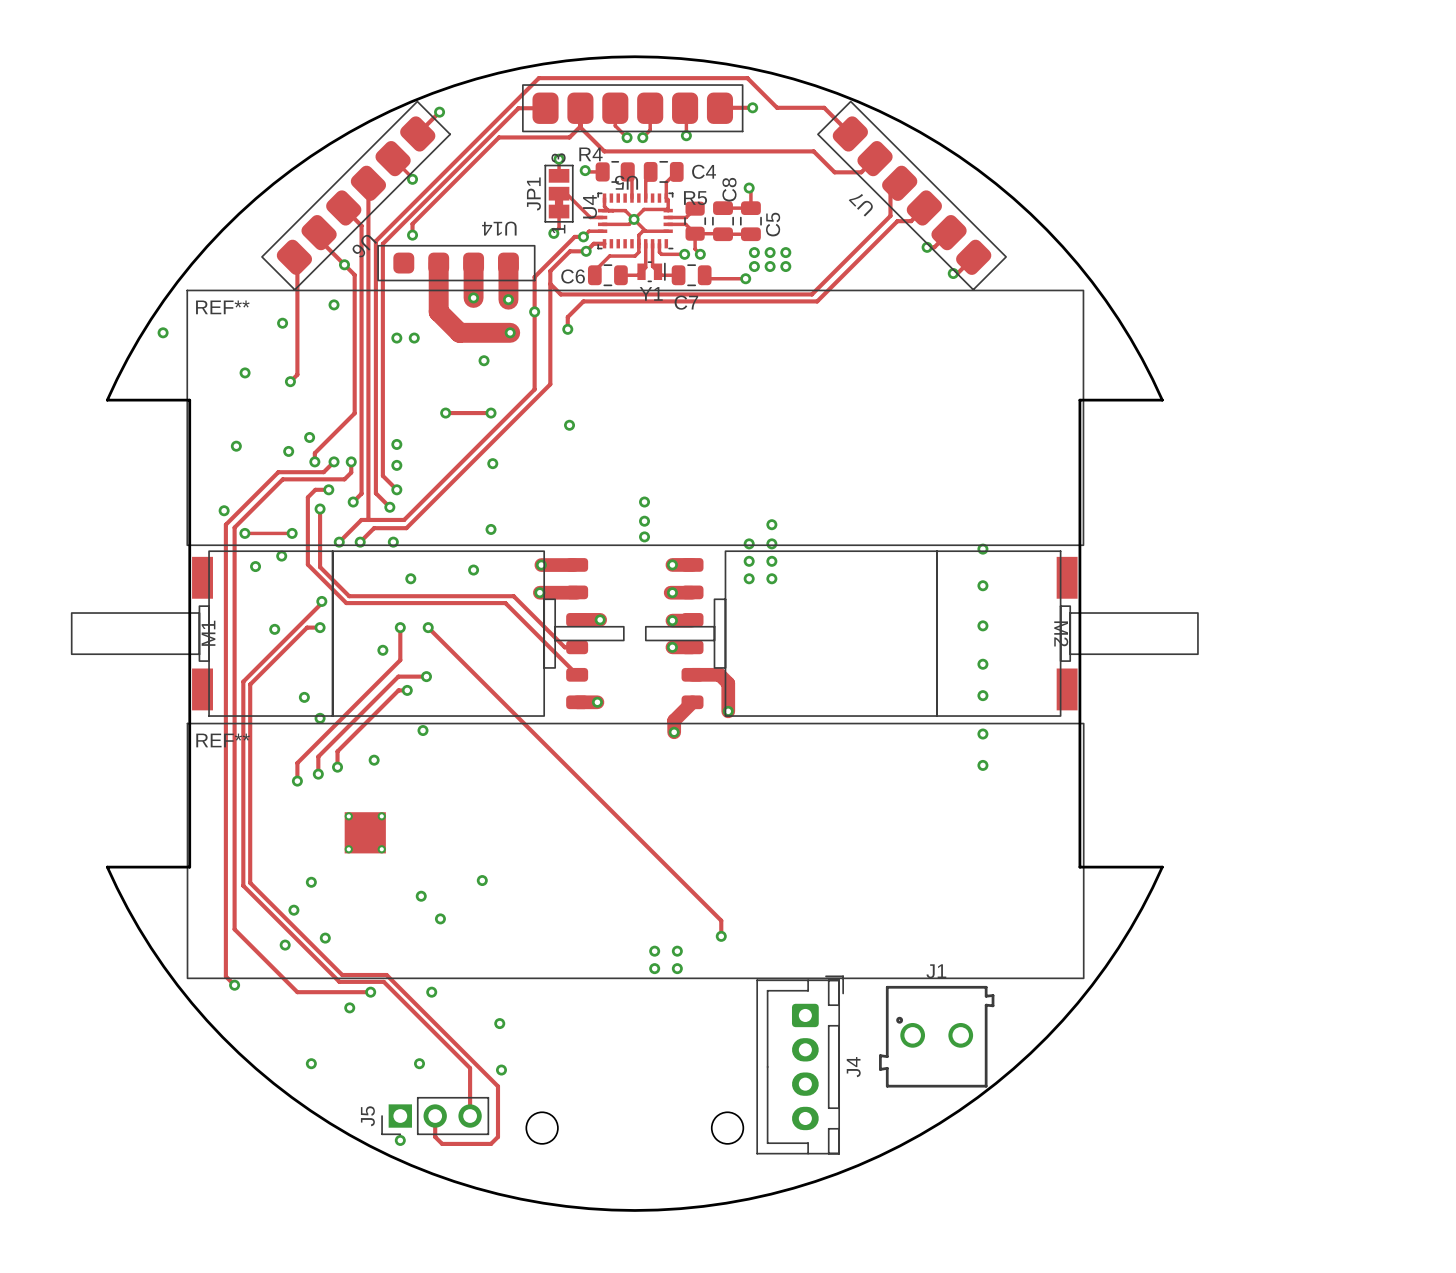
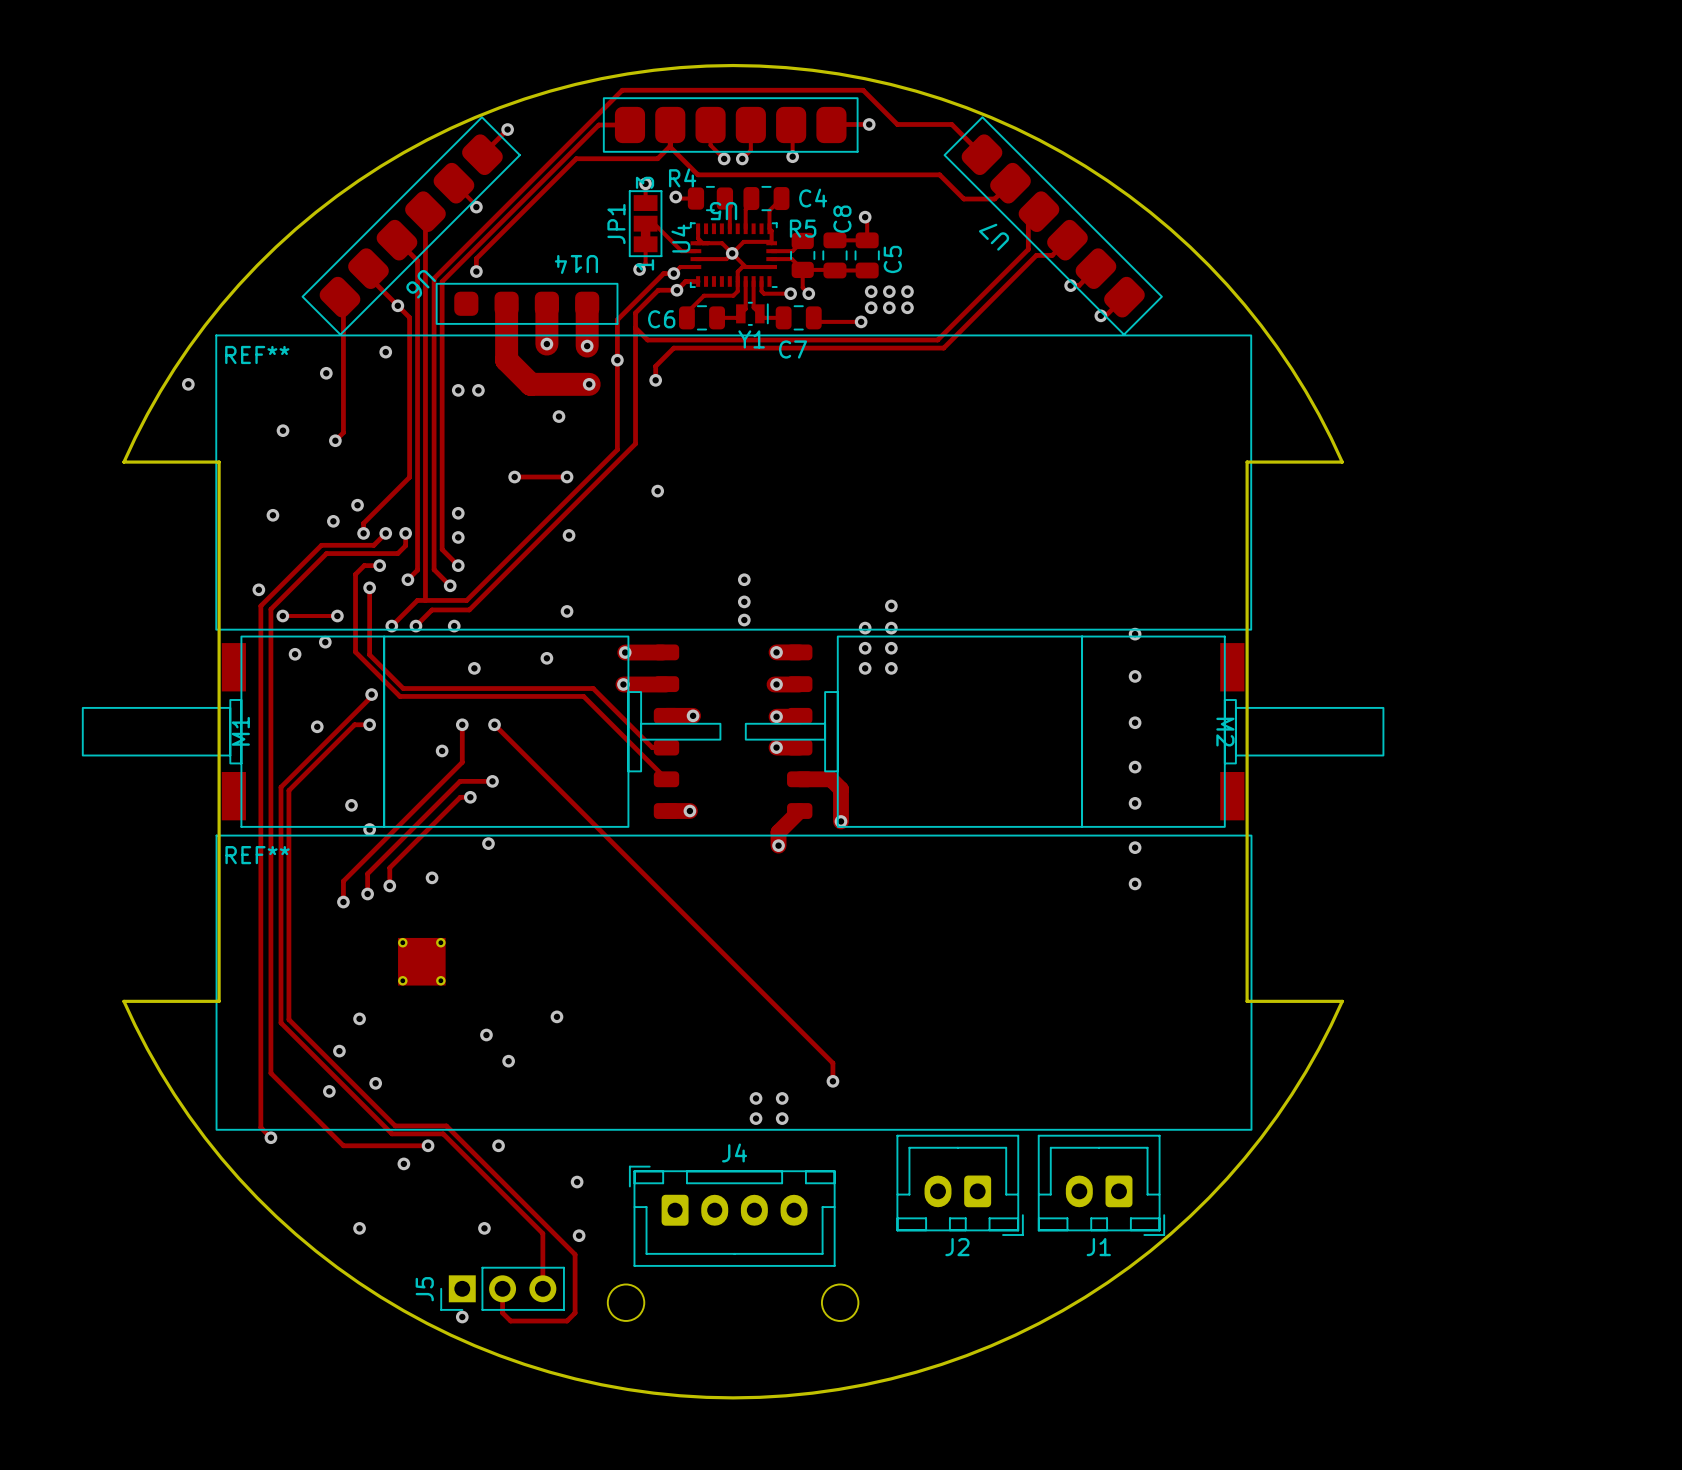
J1 name position: J1 (936, 971) -> J1 (1098, 1247)
J1 footprint: [879, 985, 995, 1088] -> [1037, 1134, 1166, 1236]
J2: none -> (960, 1185)
J4 rotation: 0° (800, 1064) -> 90° counterclockwise (732, 1216)
J4 position: (800, 1064) -> (732, 1216)

